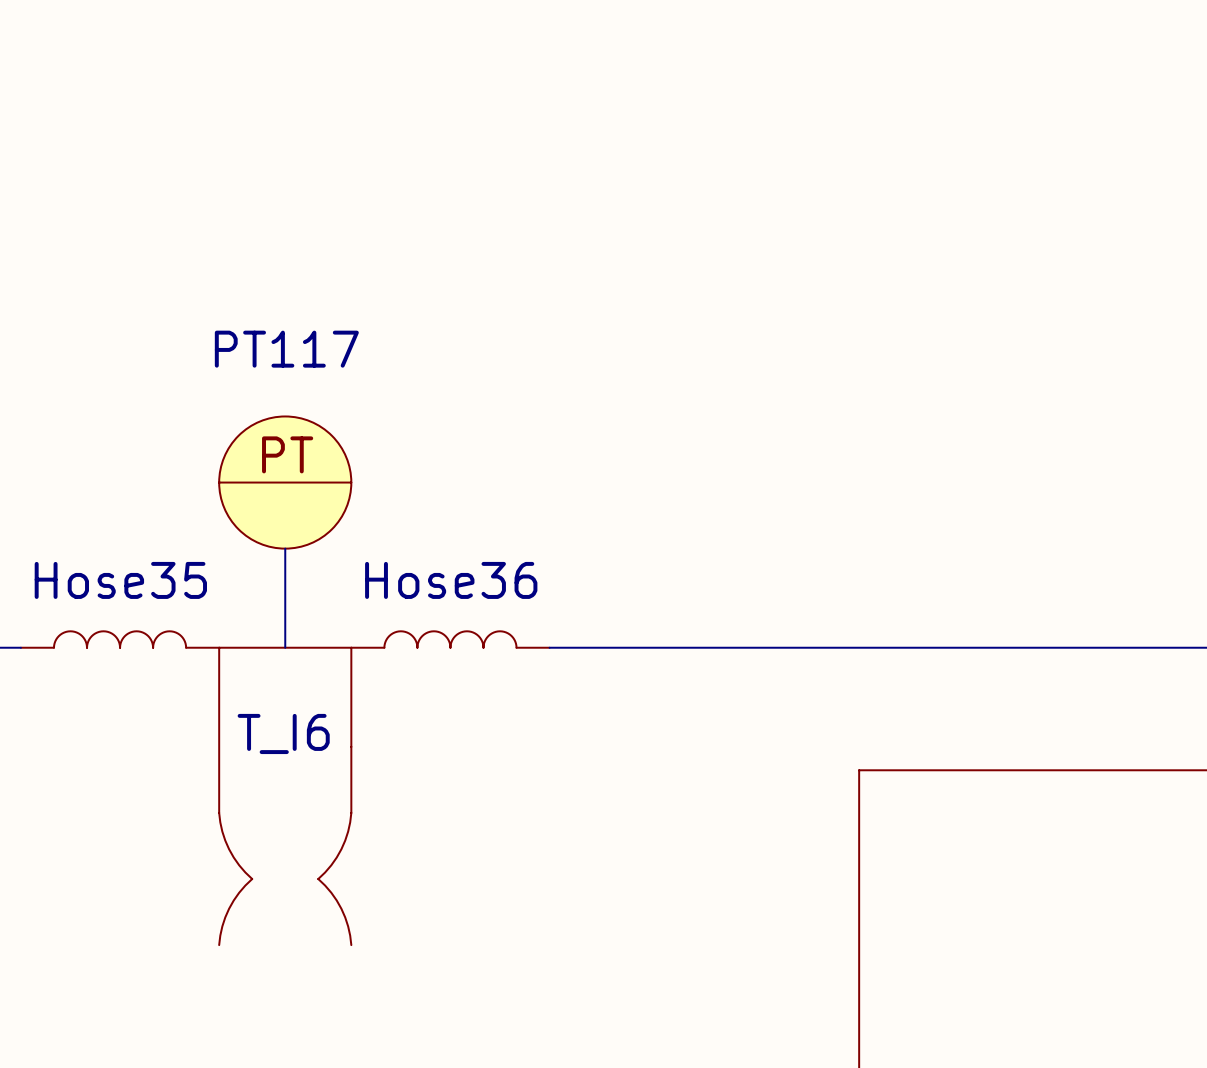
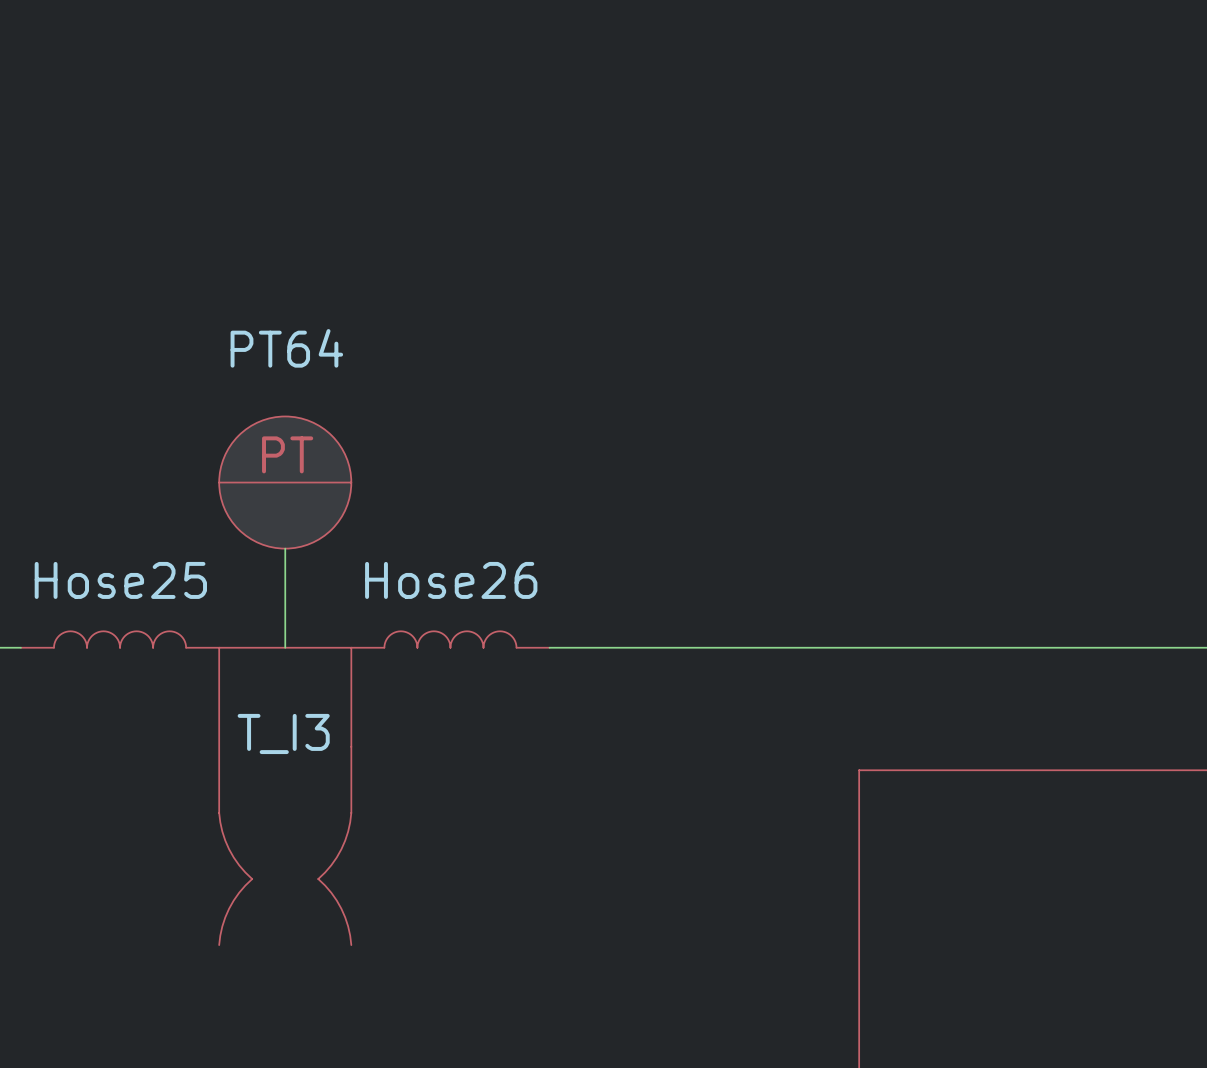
PT117 name: PT117 (286, 349) -> PT64 (286, 348)
Hose35 name: Hose35 (120, 580) -> Hose25 (120, 580)
Hose36 name: Hose36 (451, 580) -> Hose26 (451, 580)
T_I6 name: T_I6 (283, 733) -> T_I3 (283, 733)

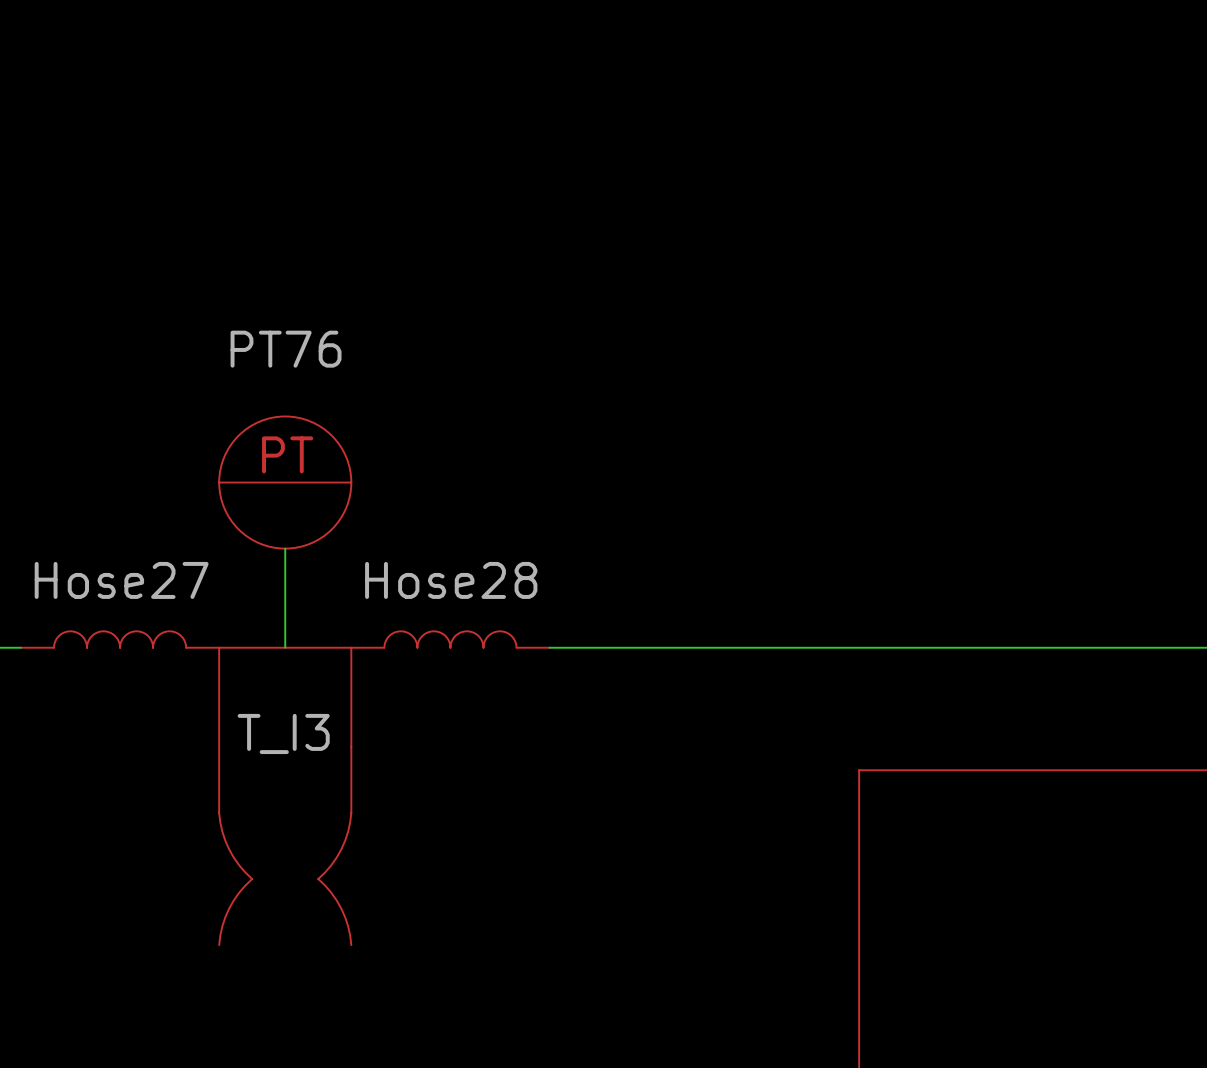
PT64 name: PT64 (286, 348) -> PT76 (286, 349)
Hose25 name: Hose25 (120, 580) -> Hose27 (121, 580)
Hose26 name: Hose26 (451, 580) -> Hose28 (451, 580)

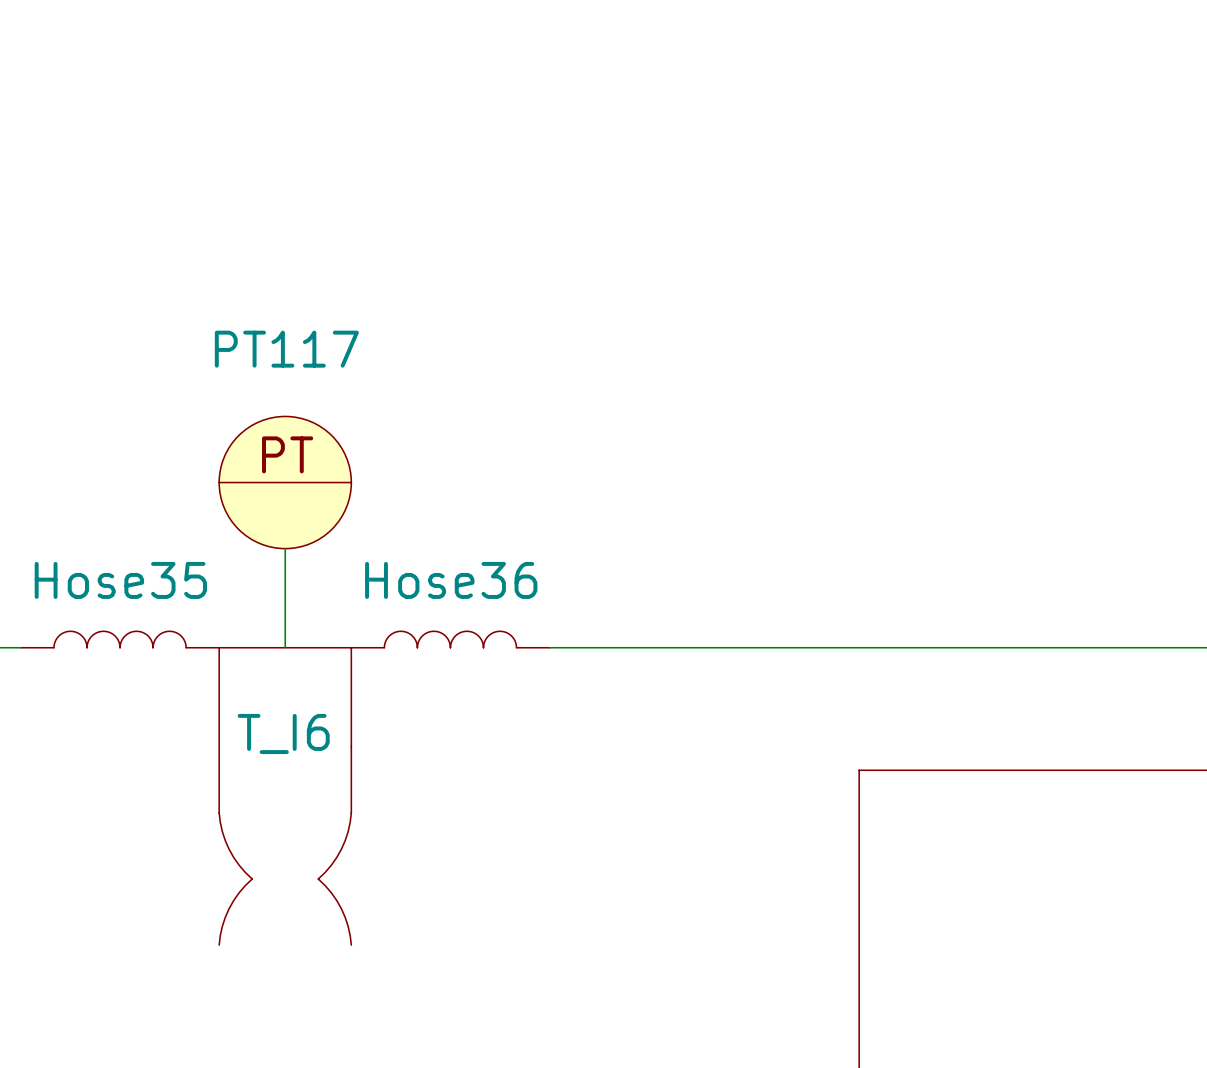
PT76 name: PT76 (286, 349) -> PT117 (286, 349)
Hose27 name: Hose27 (121, 580) -> Hose35 (120, 580)
Hose28 name: Hose28 (451, 580) -> Hose36 (451, 580)
T_I3 name: T_I3 (283, 733) -> T_I6 (283, 733)

